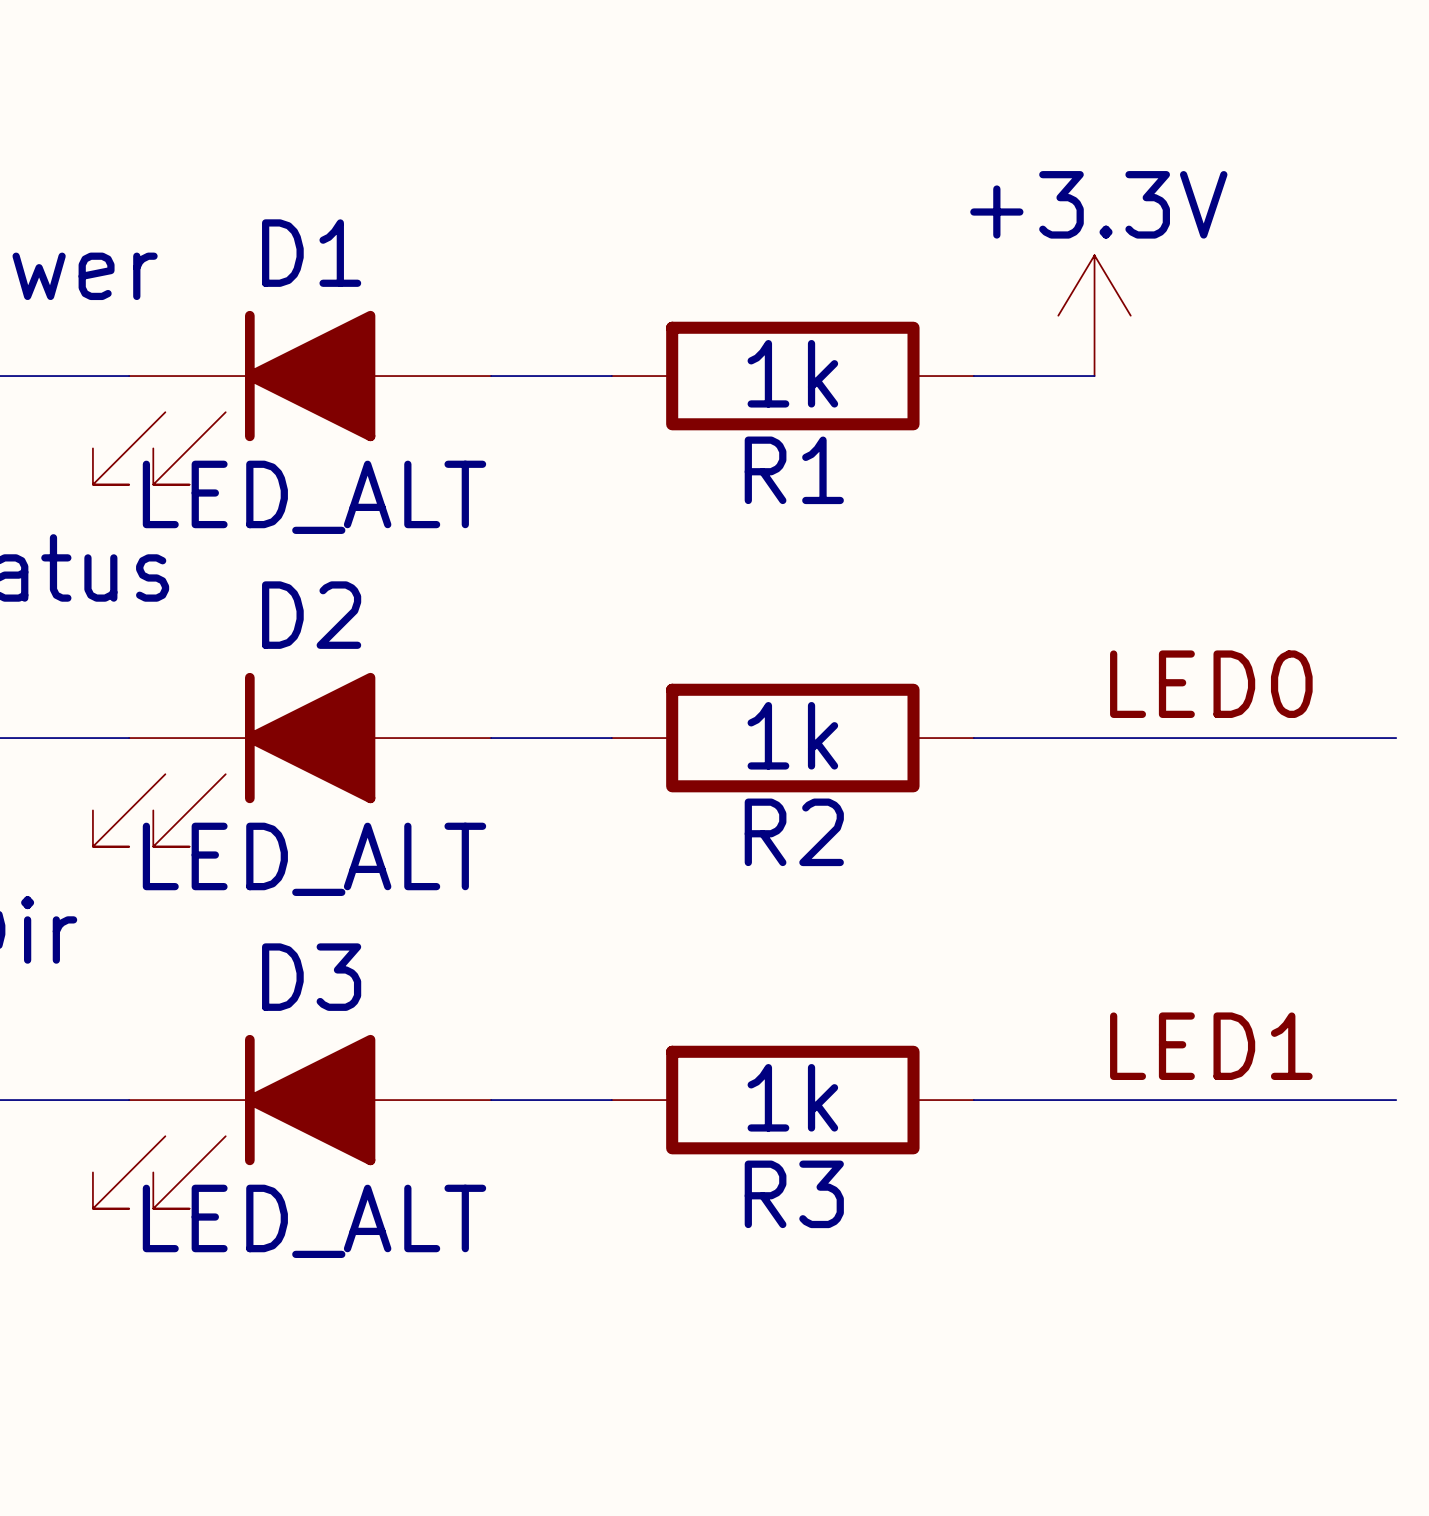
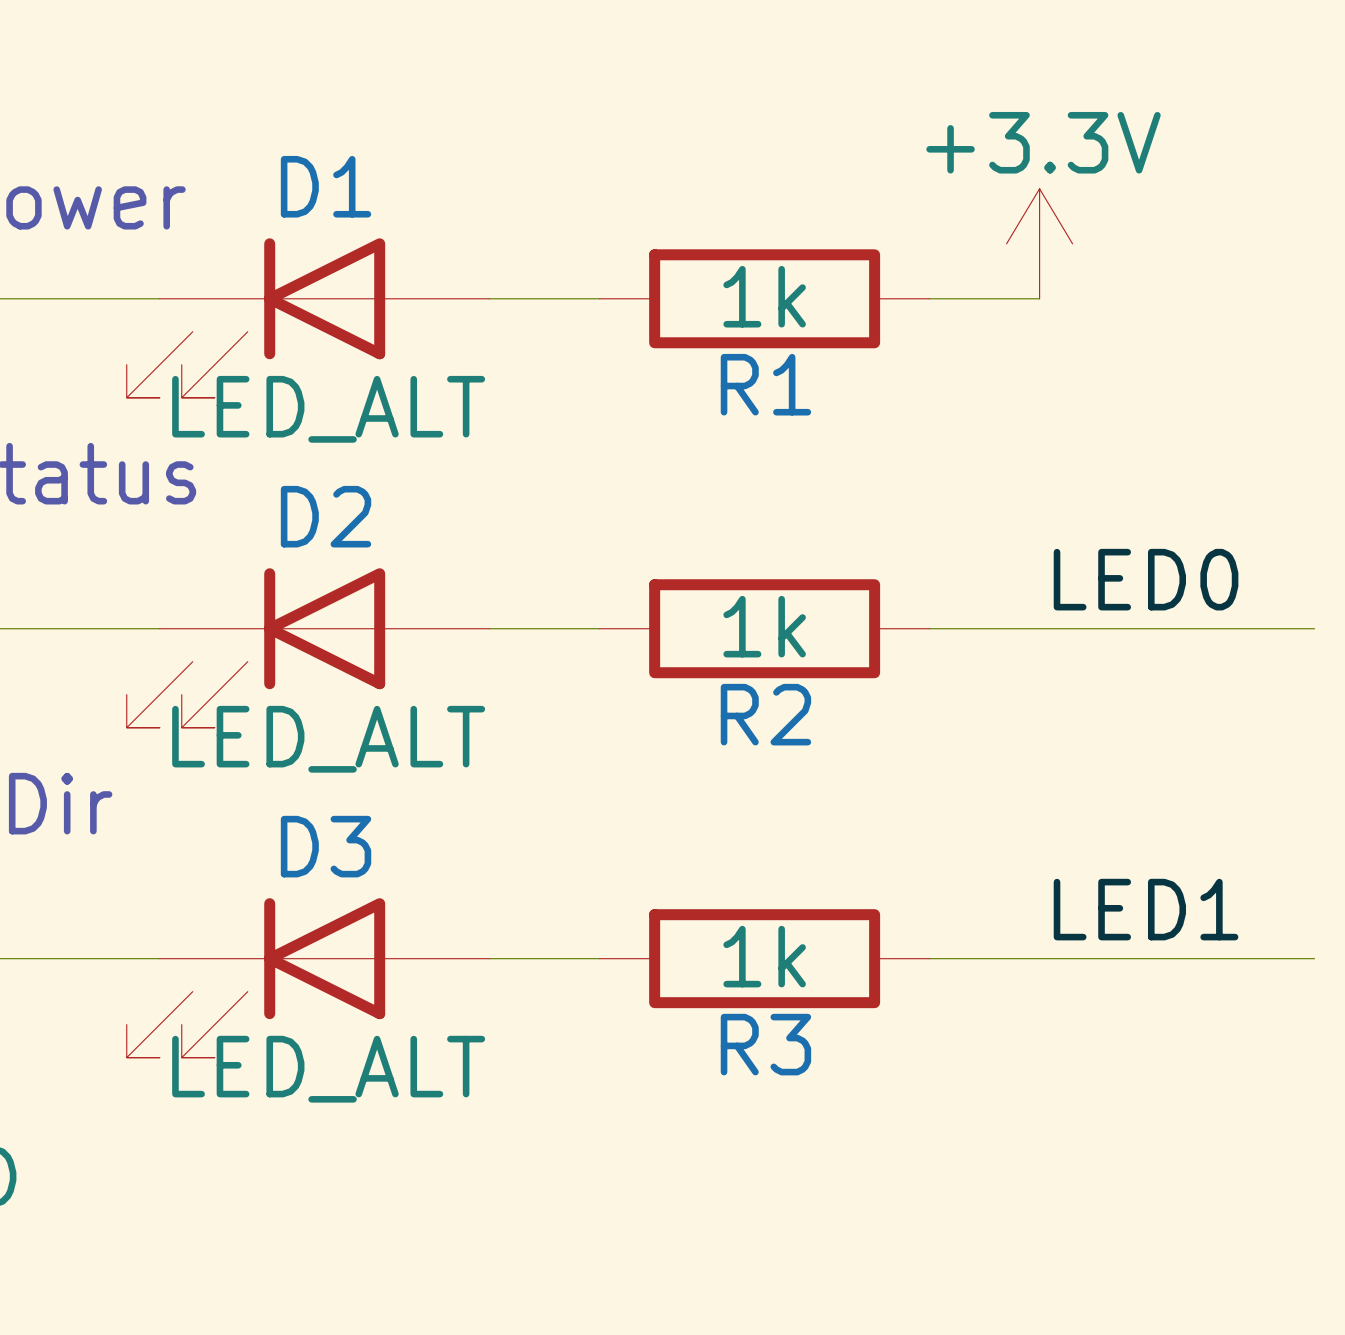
D1 symbol: [92, 310, 492, 485] -> [126, 238, 490, 398]
D2 symbol: [92, 672, 492, 847] -> [126, 568, 490, 728]
D3 symbol: [92, 1034, 492, 1209] -> [126, 898, 490, 1058]

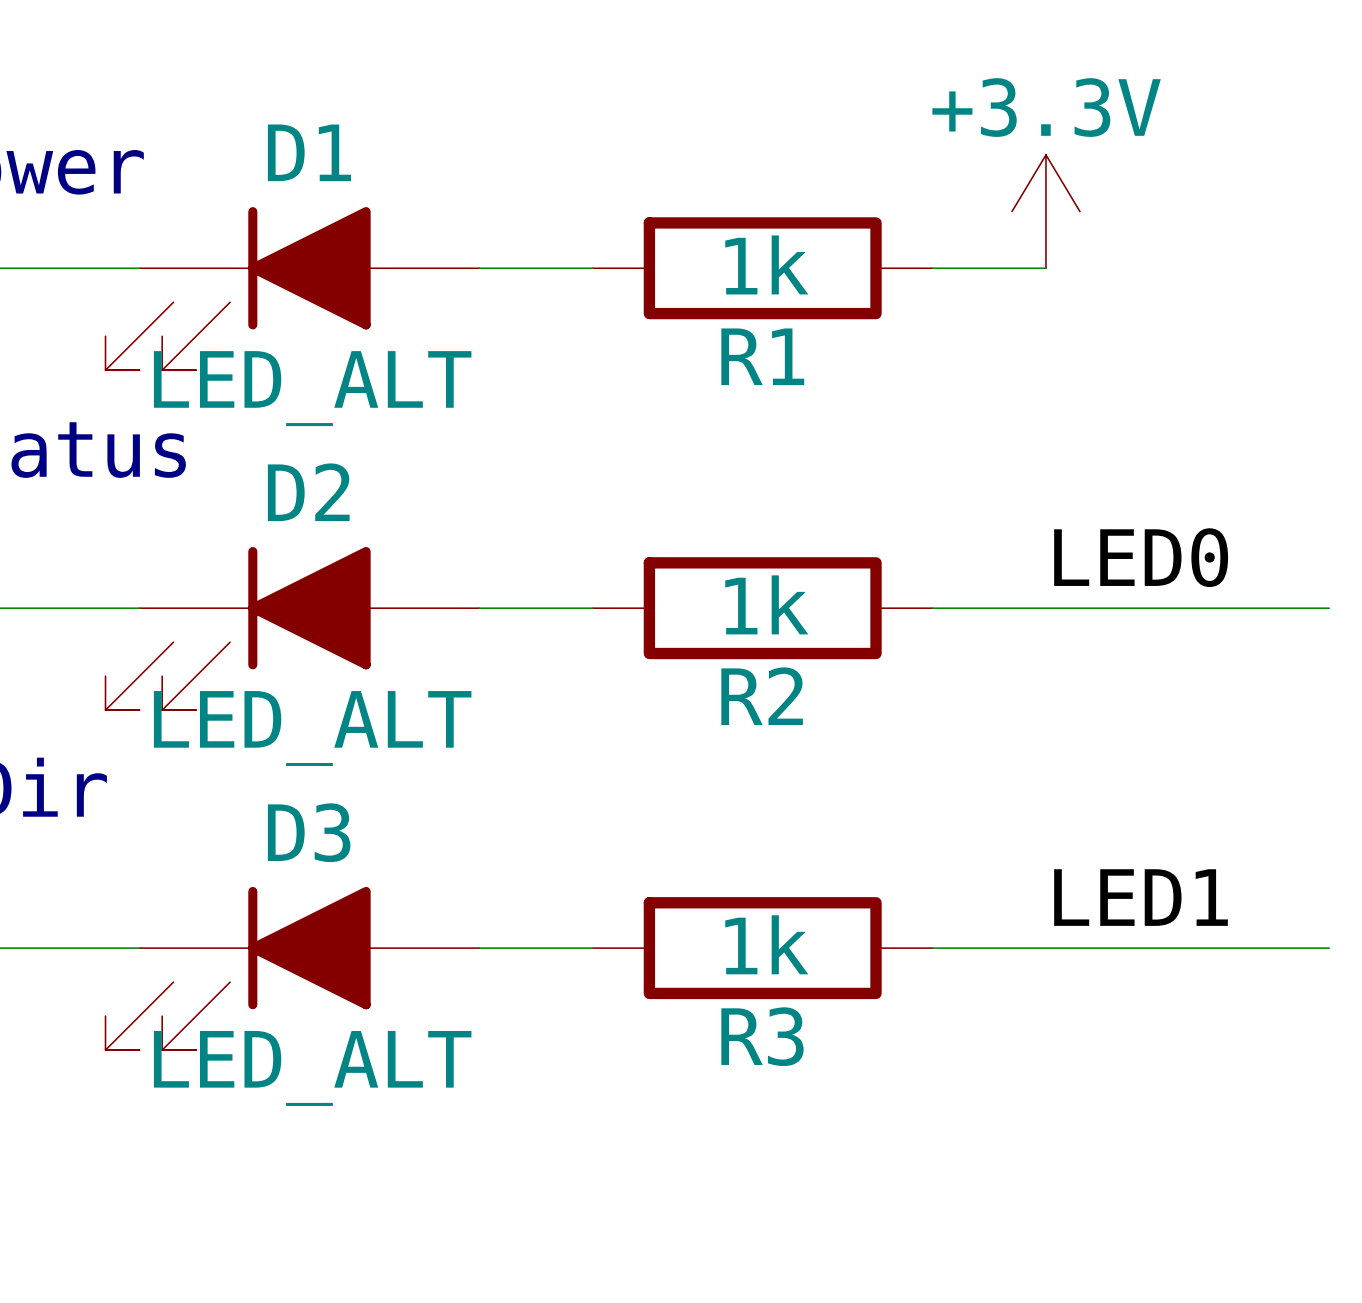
D1 symbol: [126, 238, 490, 398] -> [105, 207, 480, 371]
D2 symbol: [126, 568, 490, 728] -> [105, 546, 480, 711]
D3 symbol: [126, 898, 490, 1058] -> [105, 886, 480, 1051]

